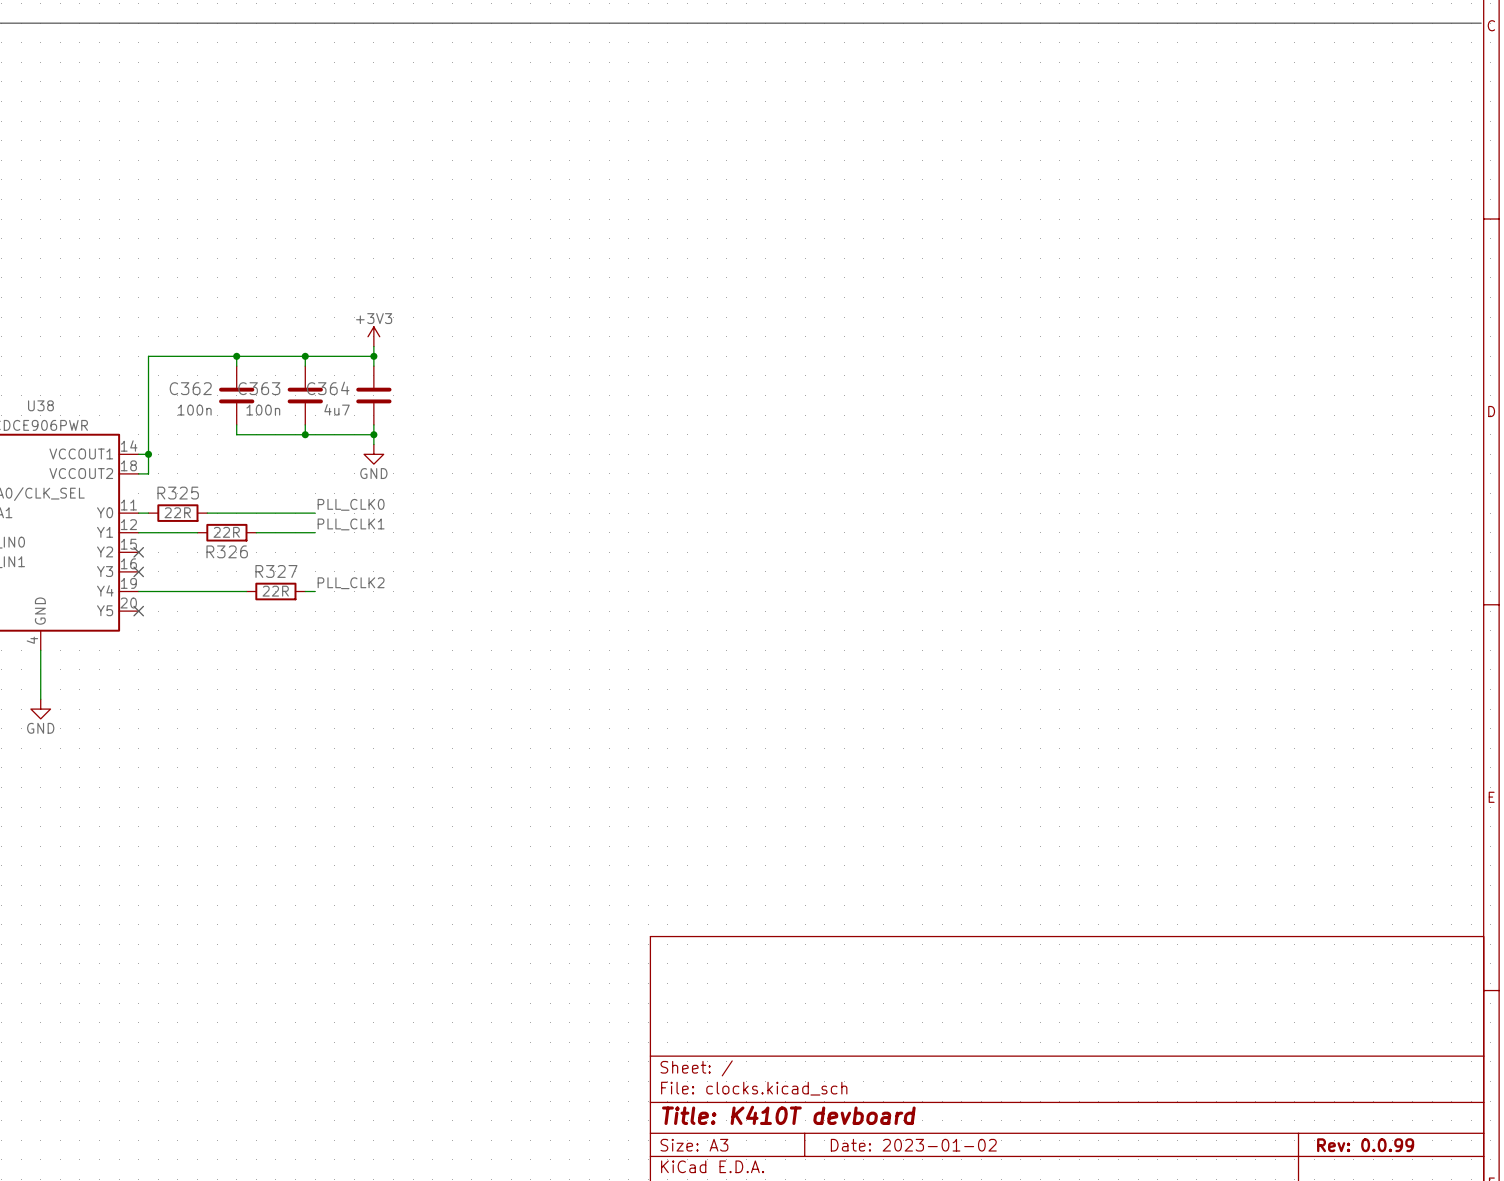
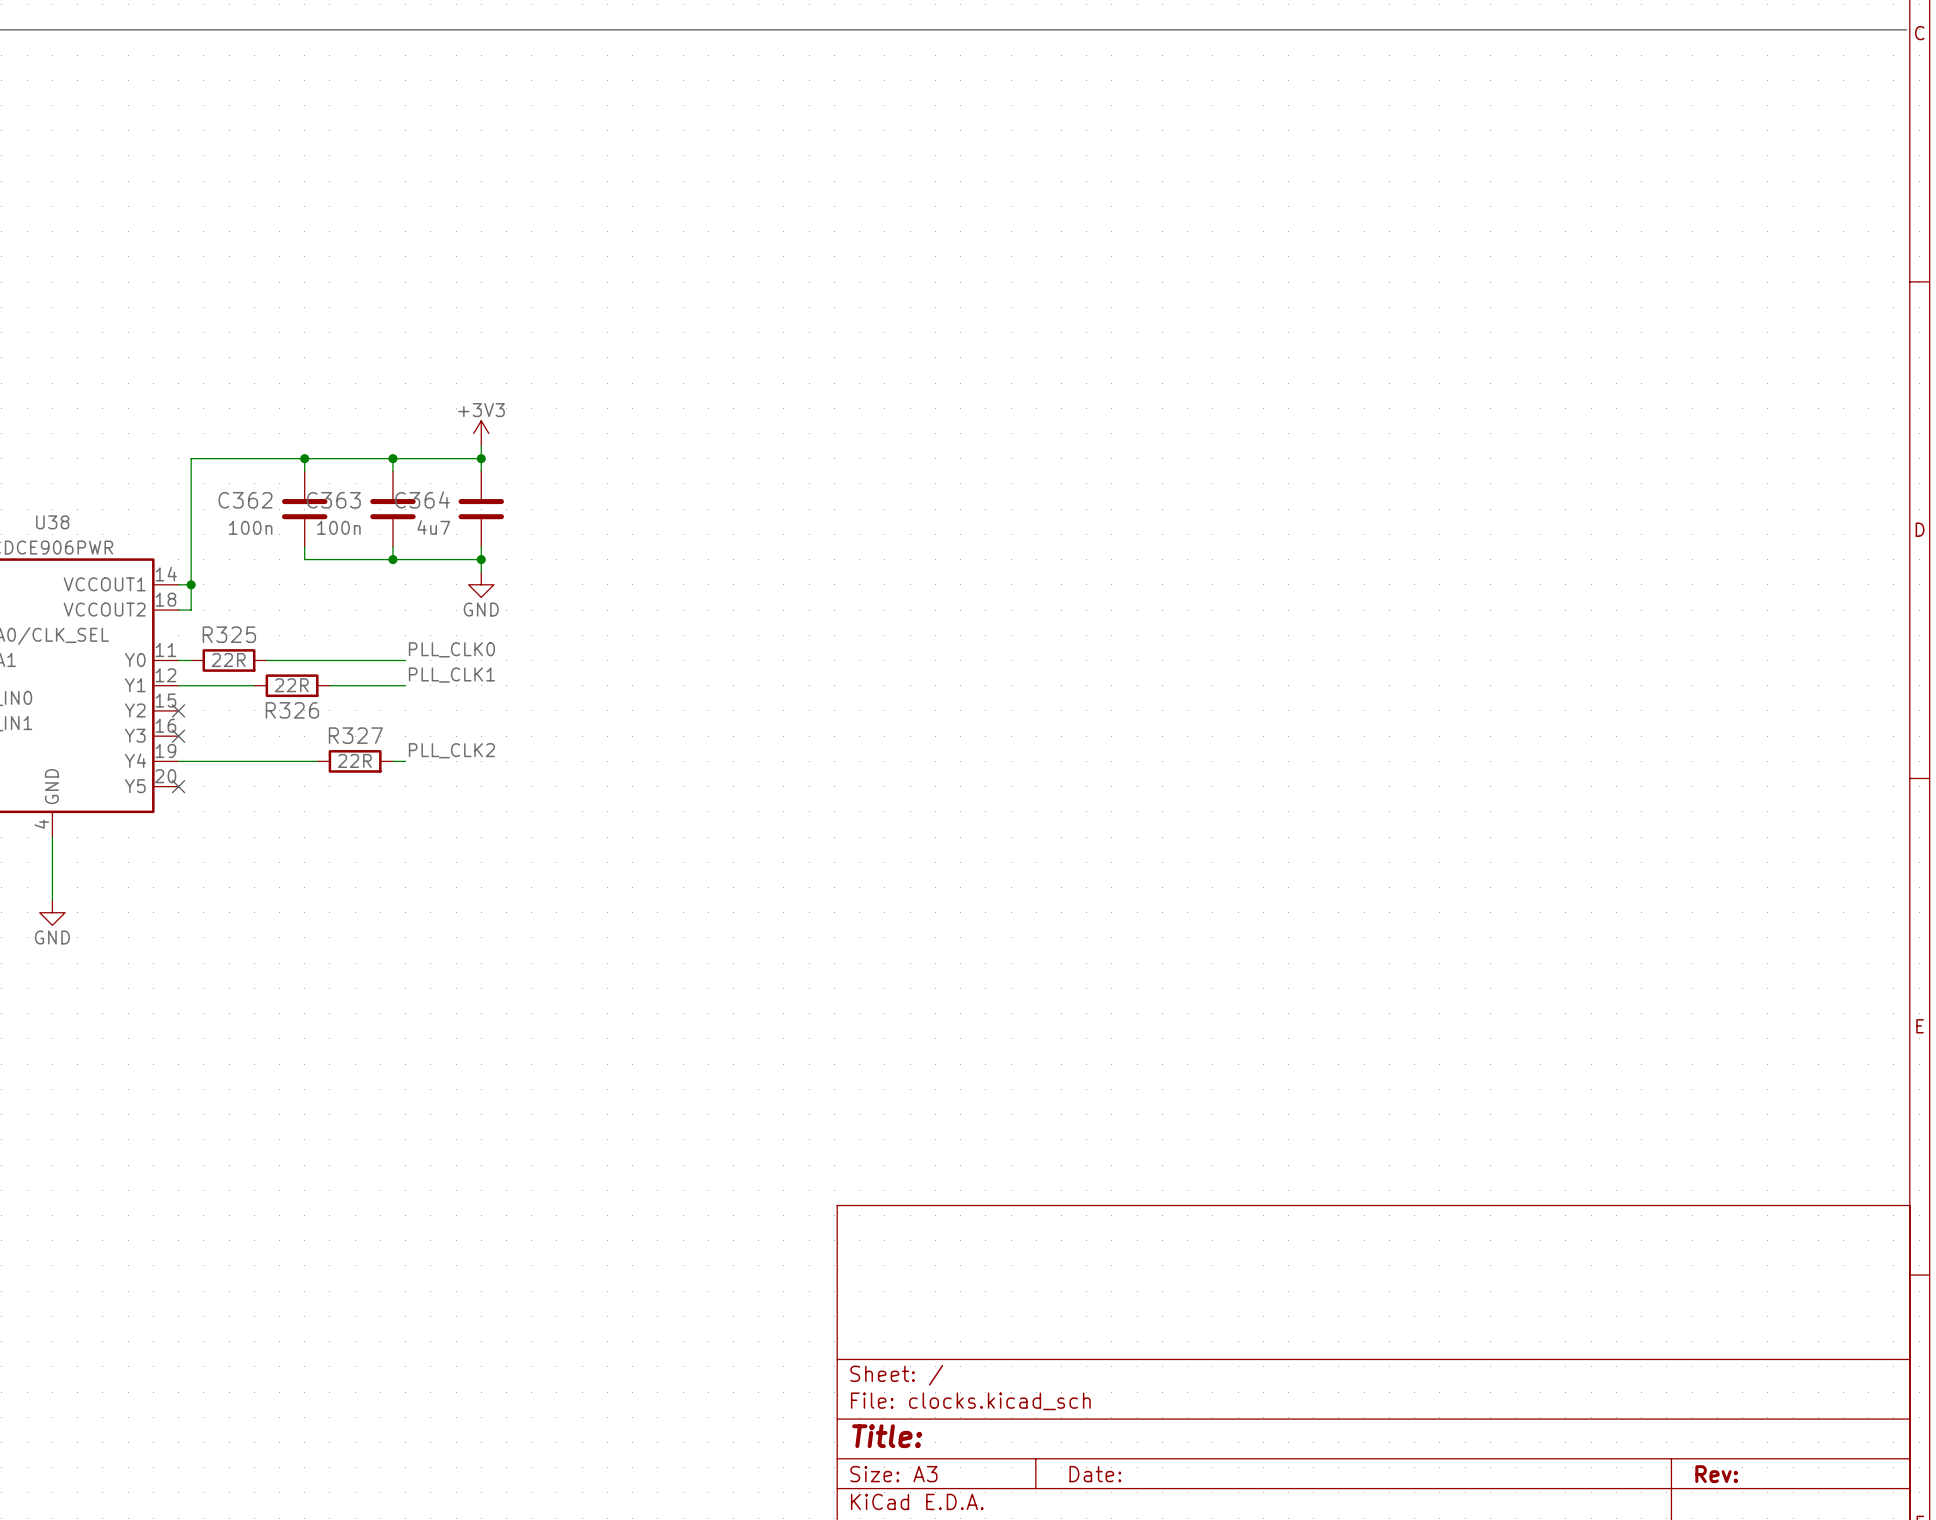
title block: Title: K410T devboard (788, 1115) -> Title: (887, 1436)
title block: Date: 2023-01-02 (913, 1145) -> Date: (1095, 1474)
title block: Rev: 0.0.99 (1365, 1145) -> Rev: (1716, 1474)

